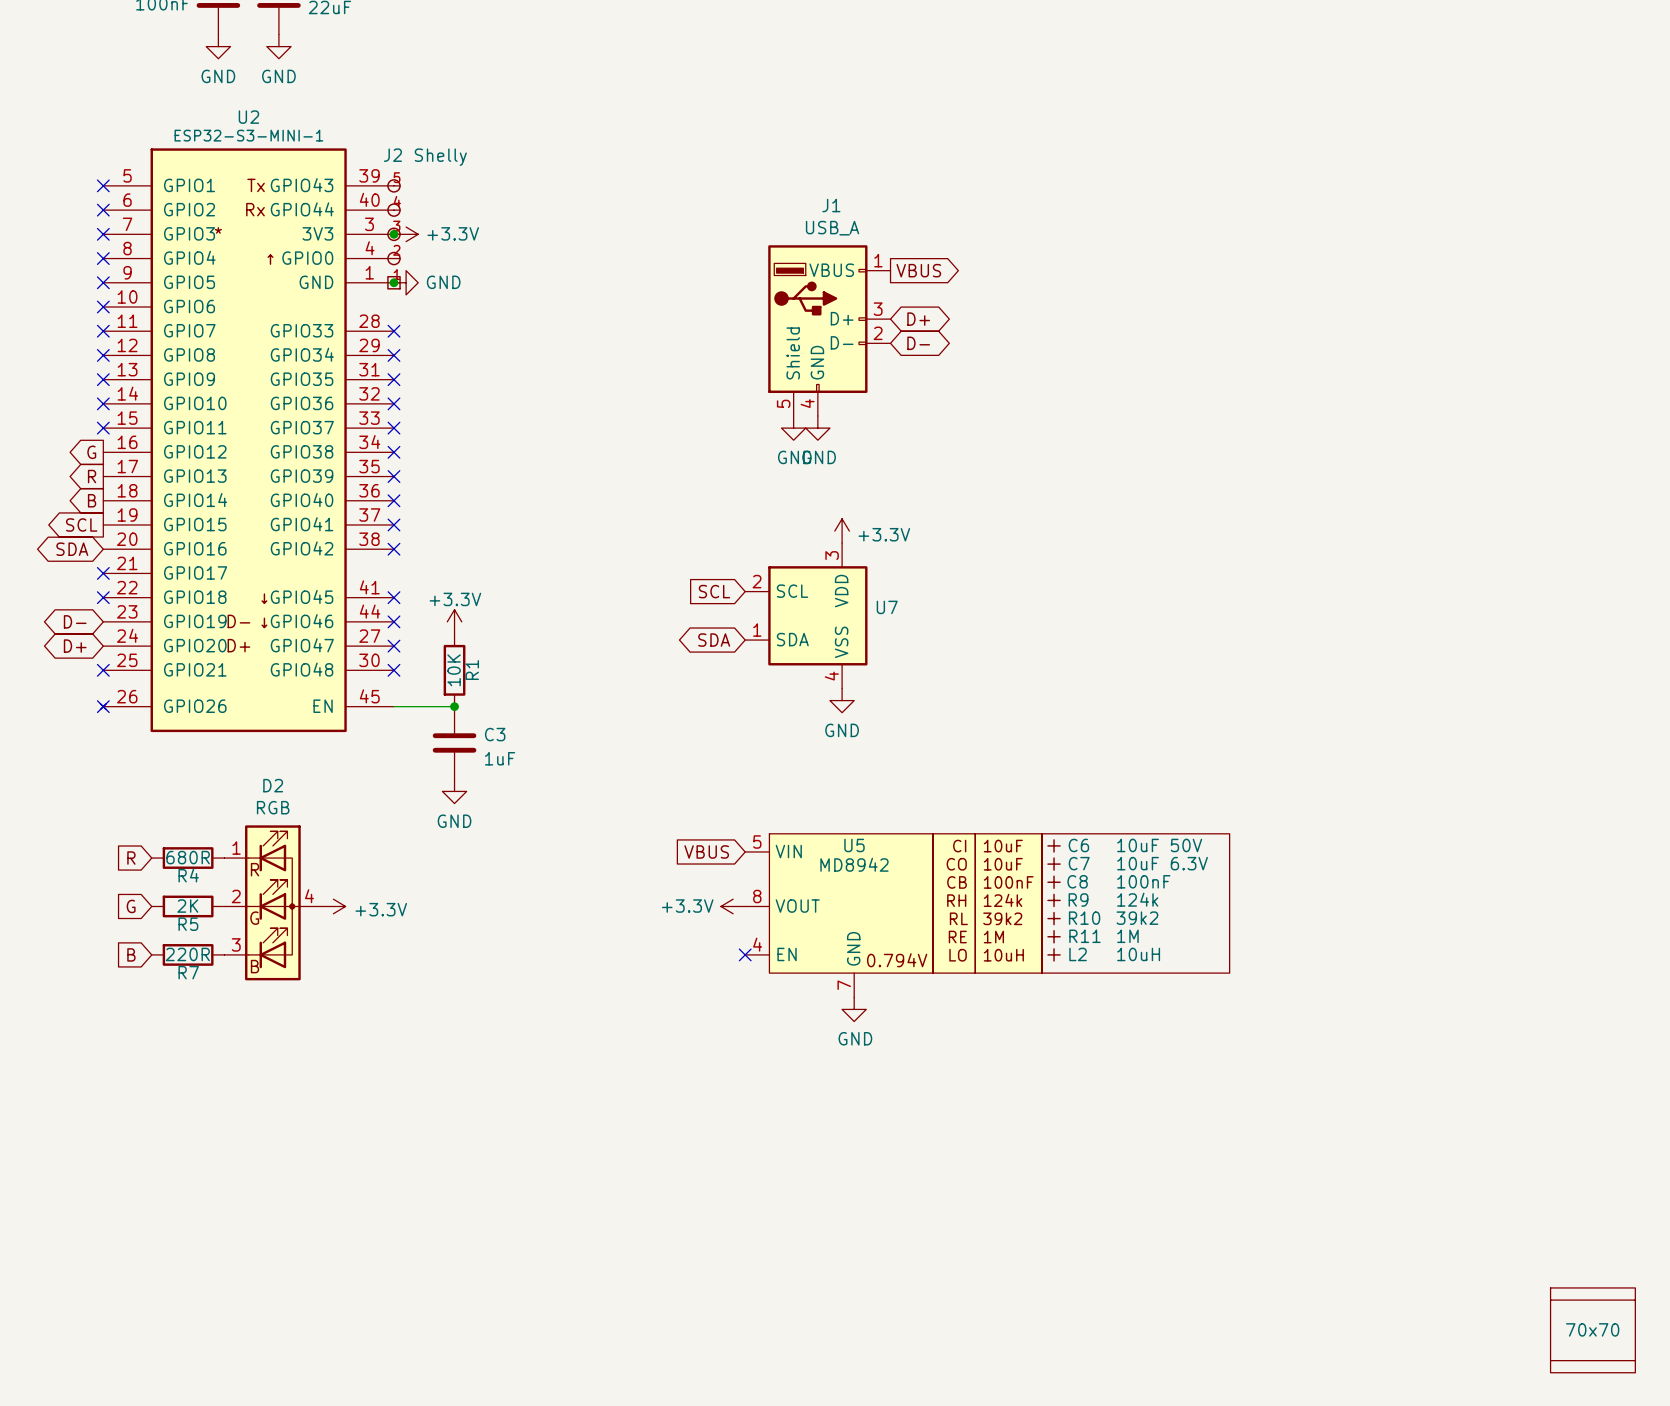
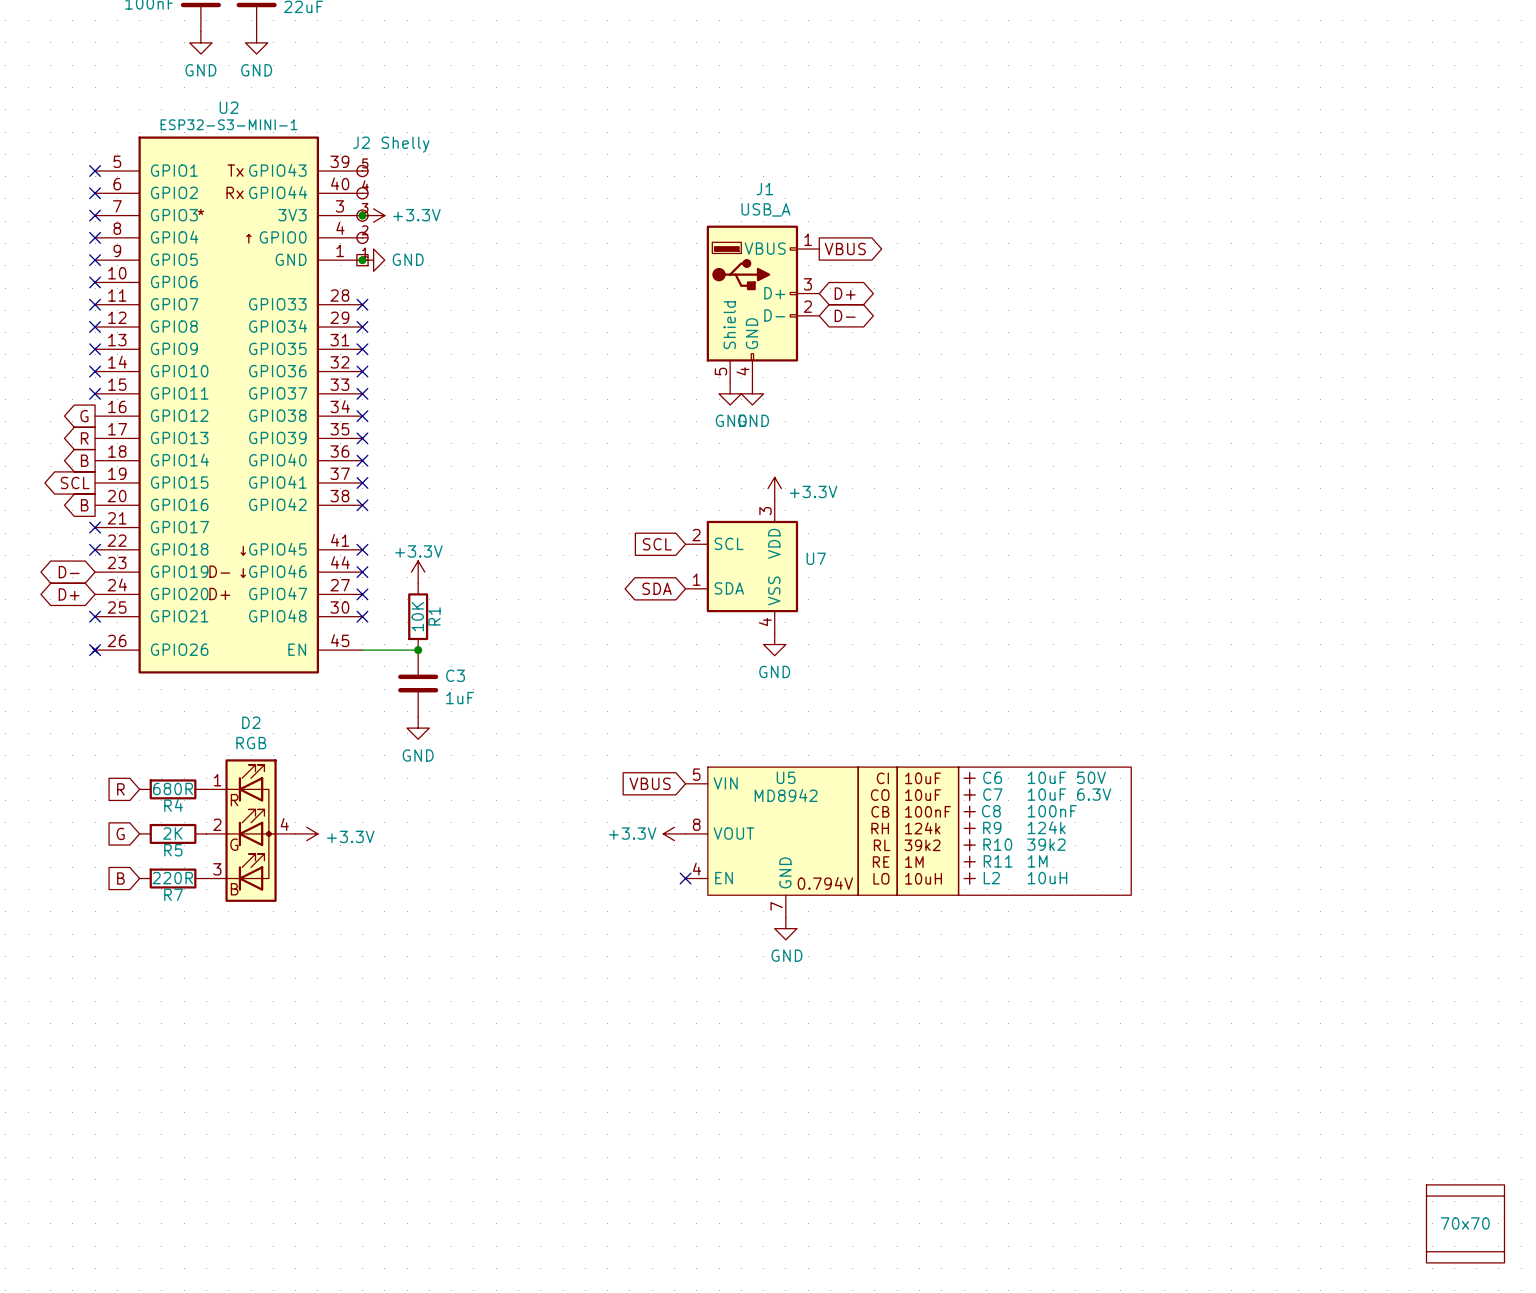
global label shape: bidirectional (72, 549) -> output (84, 505)
global label: SDA (72, 549) -> B (84, 505)

